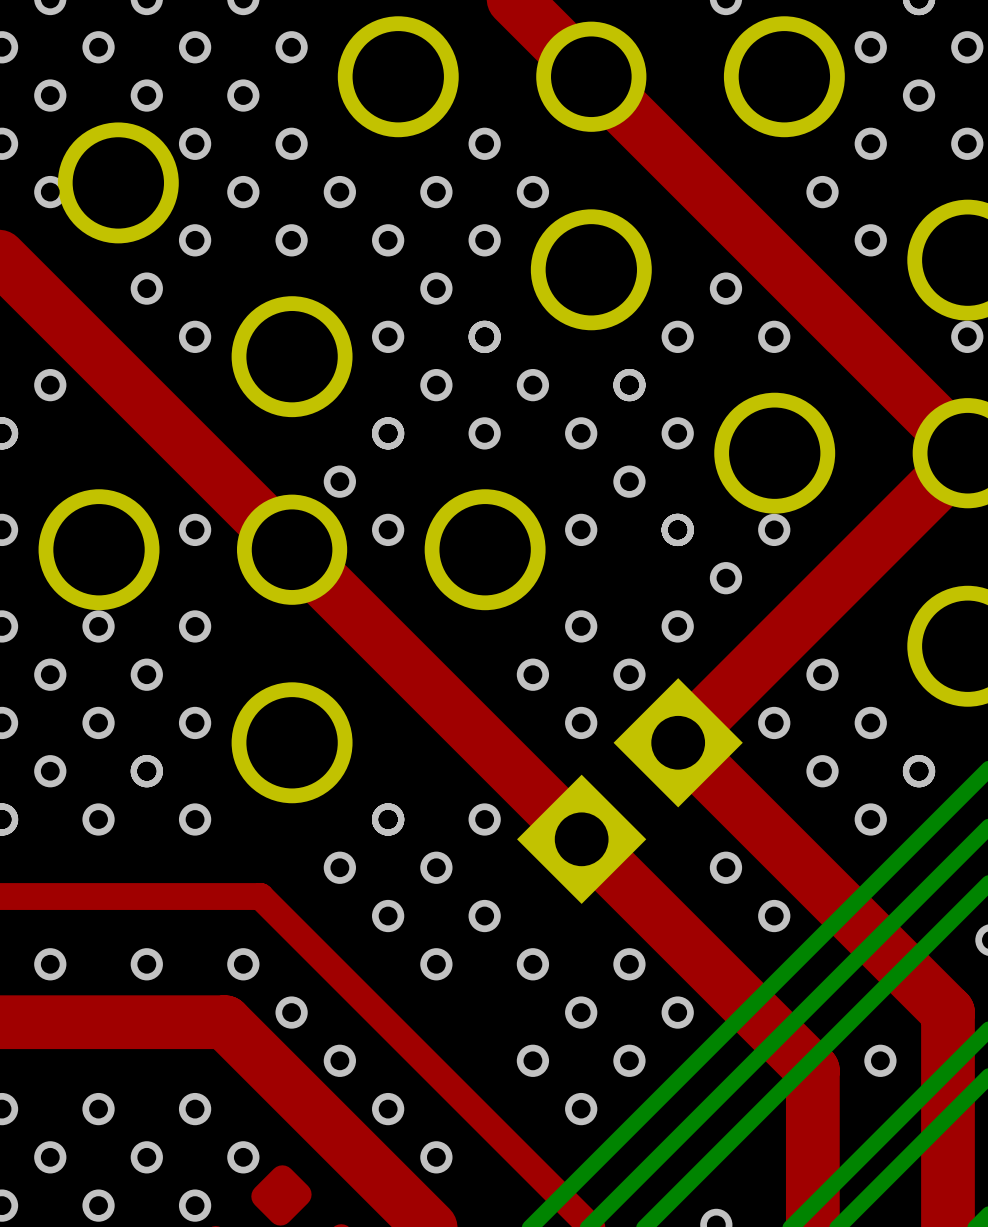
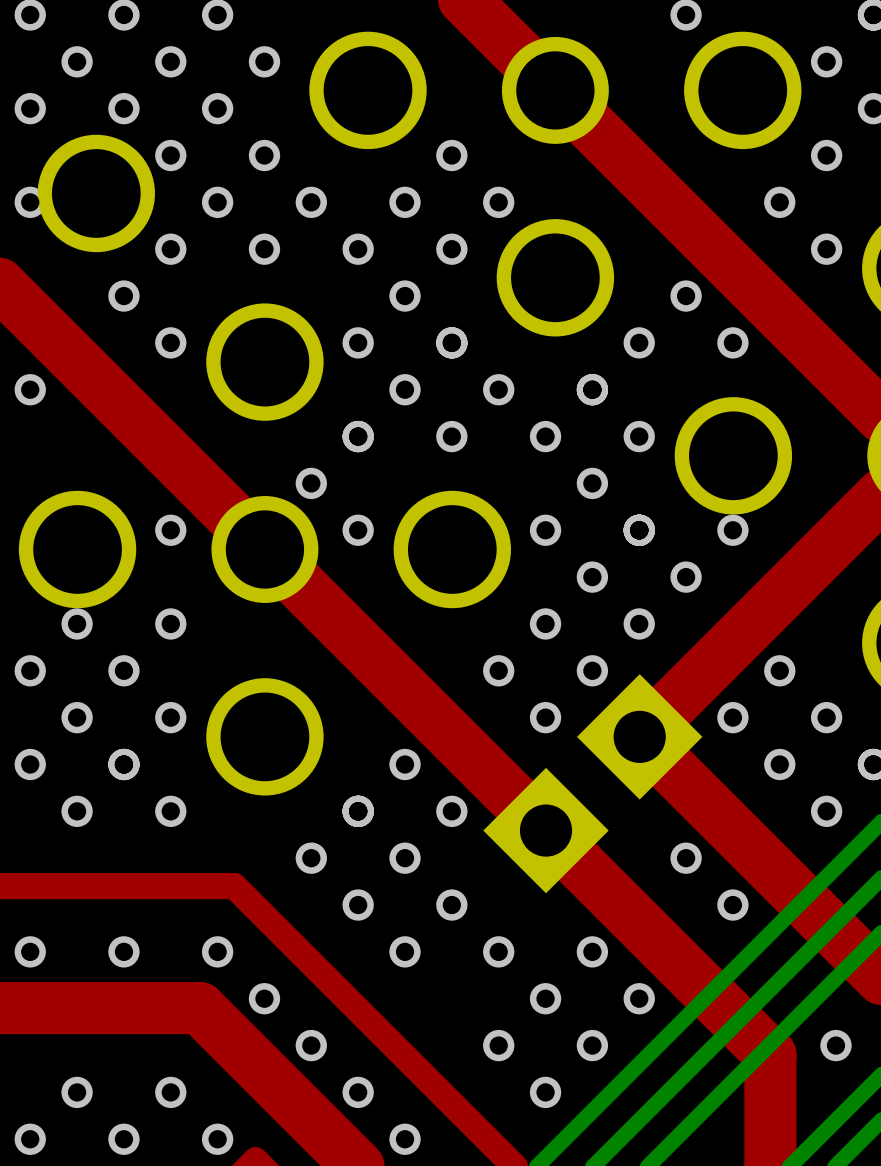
via: none -> (592, 577)
via: none -> (405, 764)

